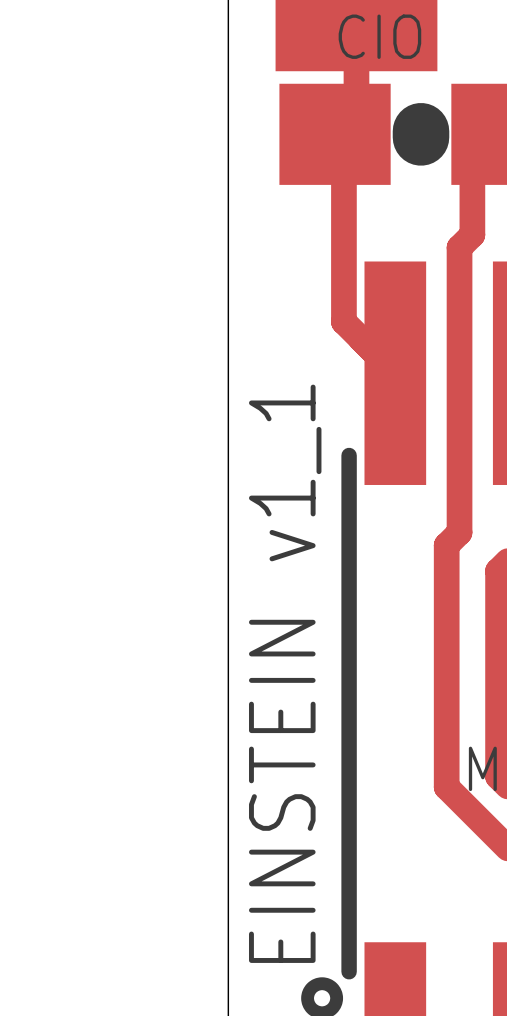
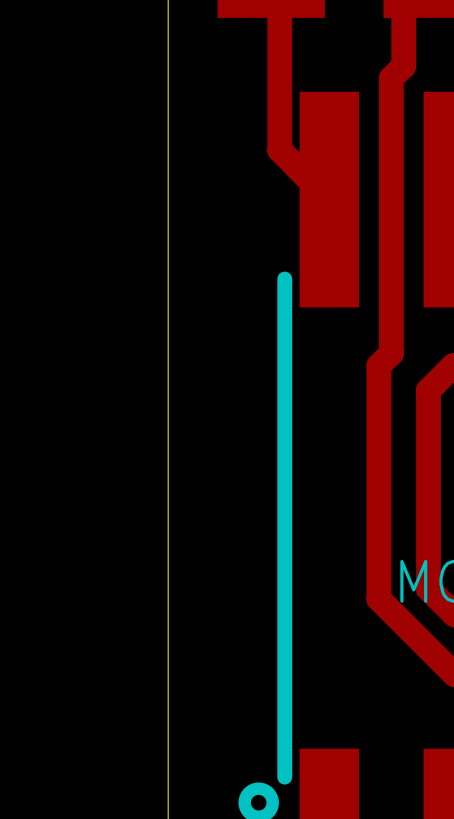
text: EINSTEIN v1_1 (285, 673) -> none

